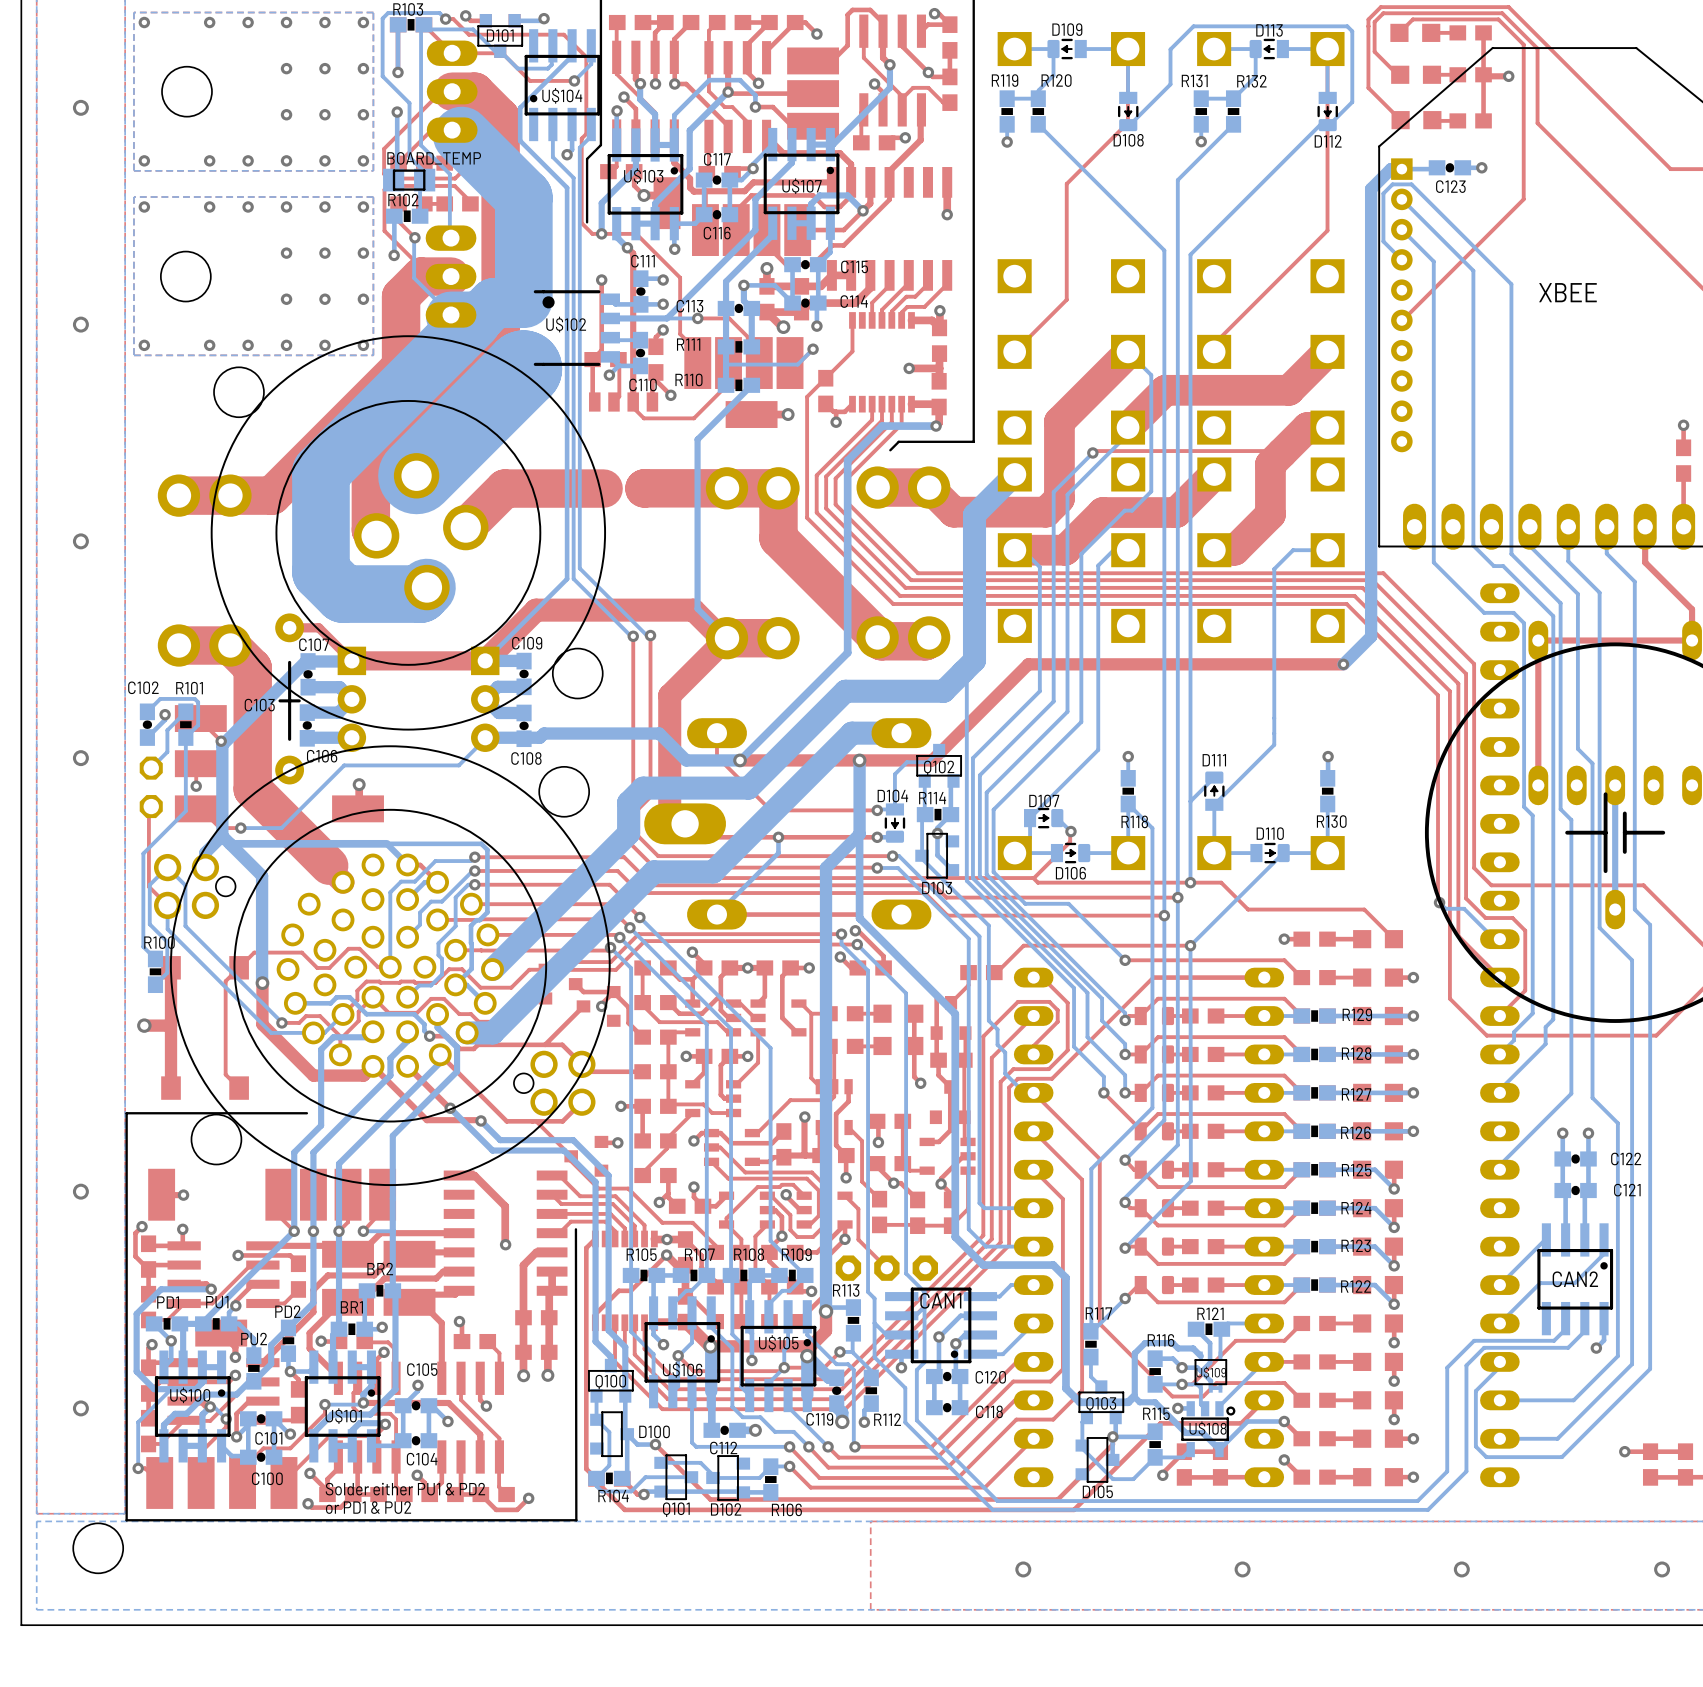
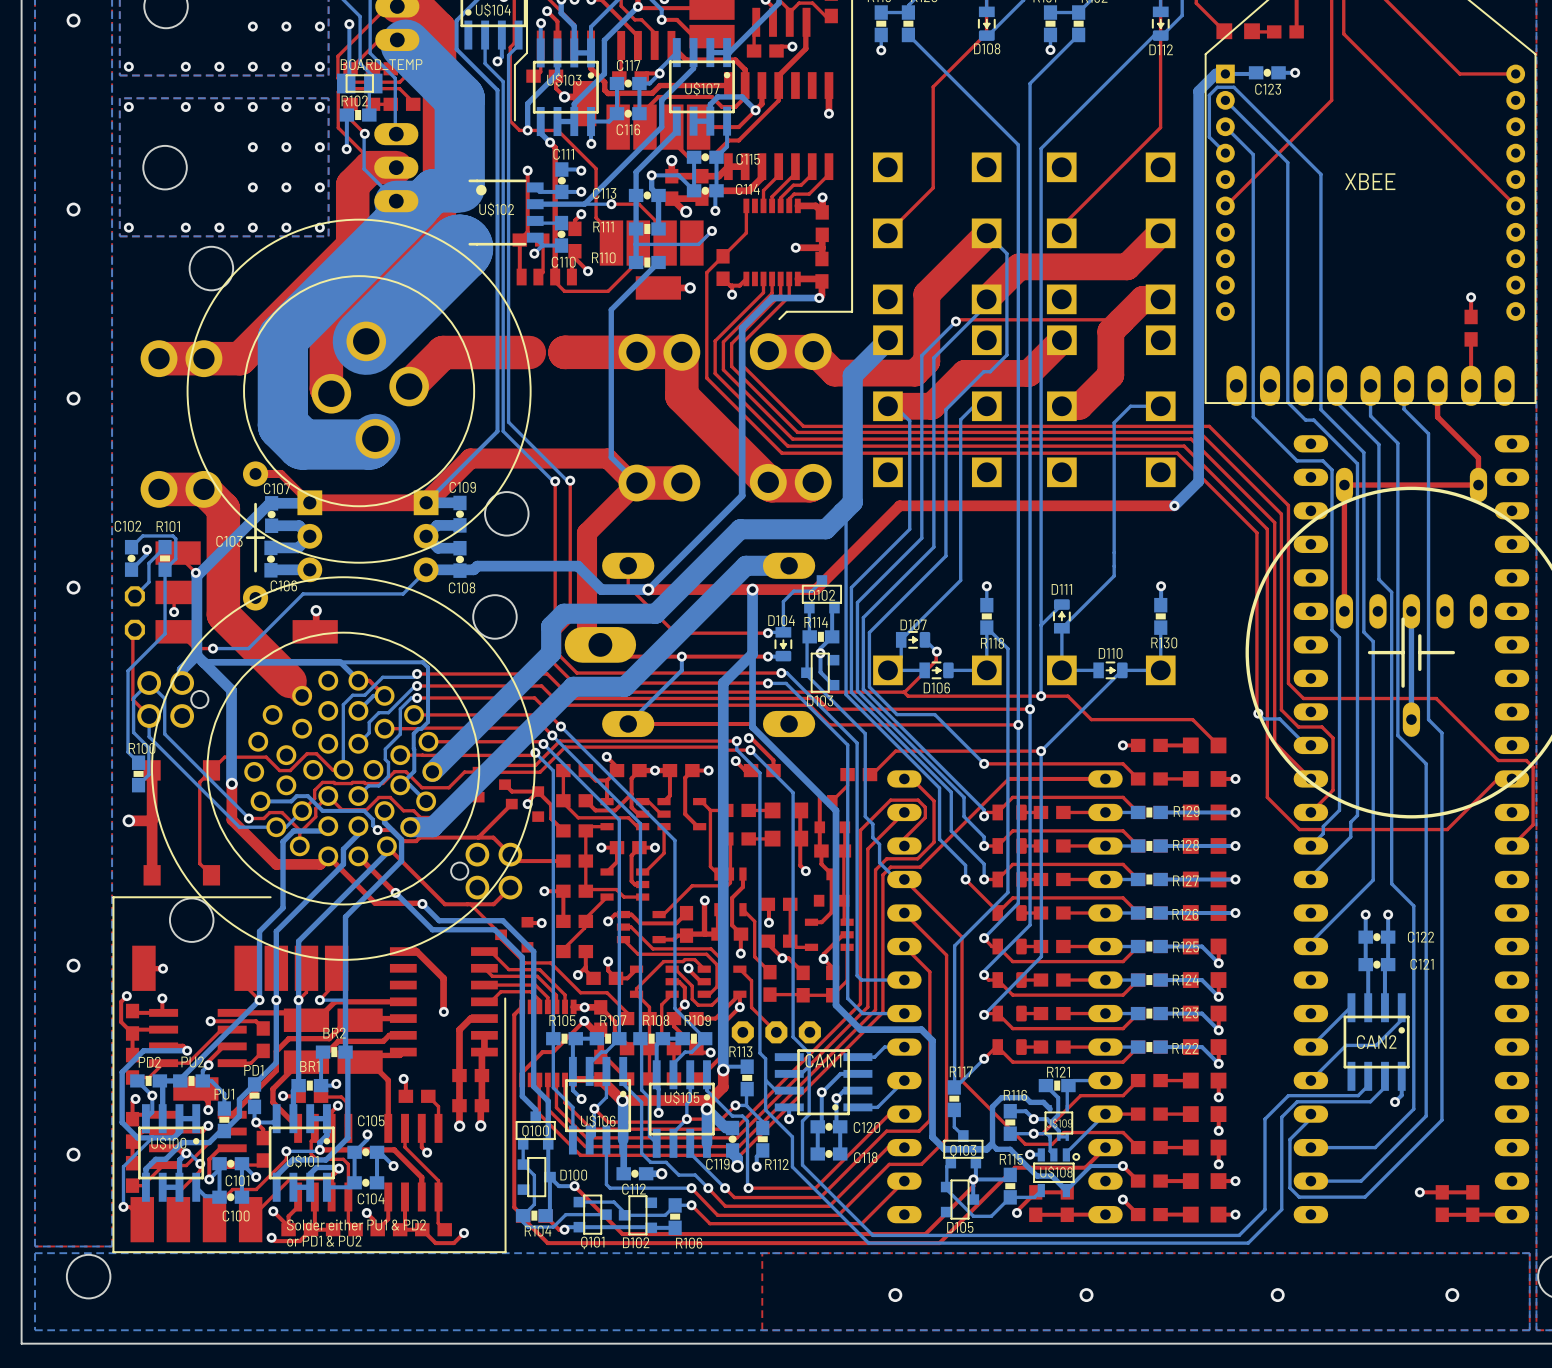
PD1 name: PD1 (168, 1302) -> PD2 (149, 1062)
PU1 name: PU1 (217, 1302) -> PU2 (192, 1061)
PD2 name: PD2 (287, 1311) -> PD1 (253, 1070)
PU2 name: PU2 (254, 1339) -> PU1 (224, 1094)

